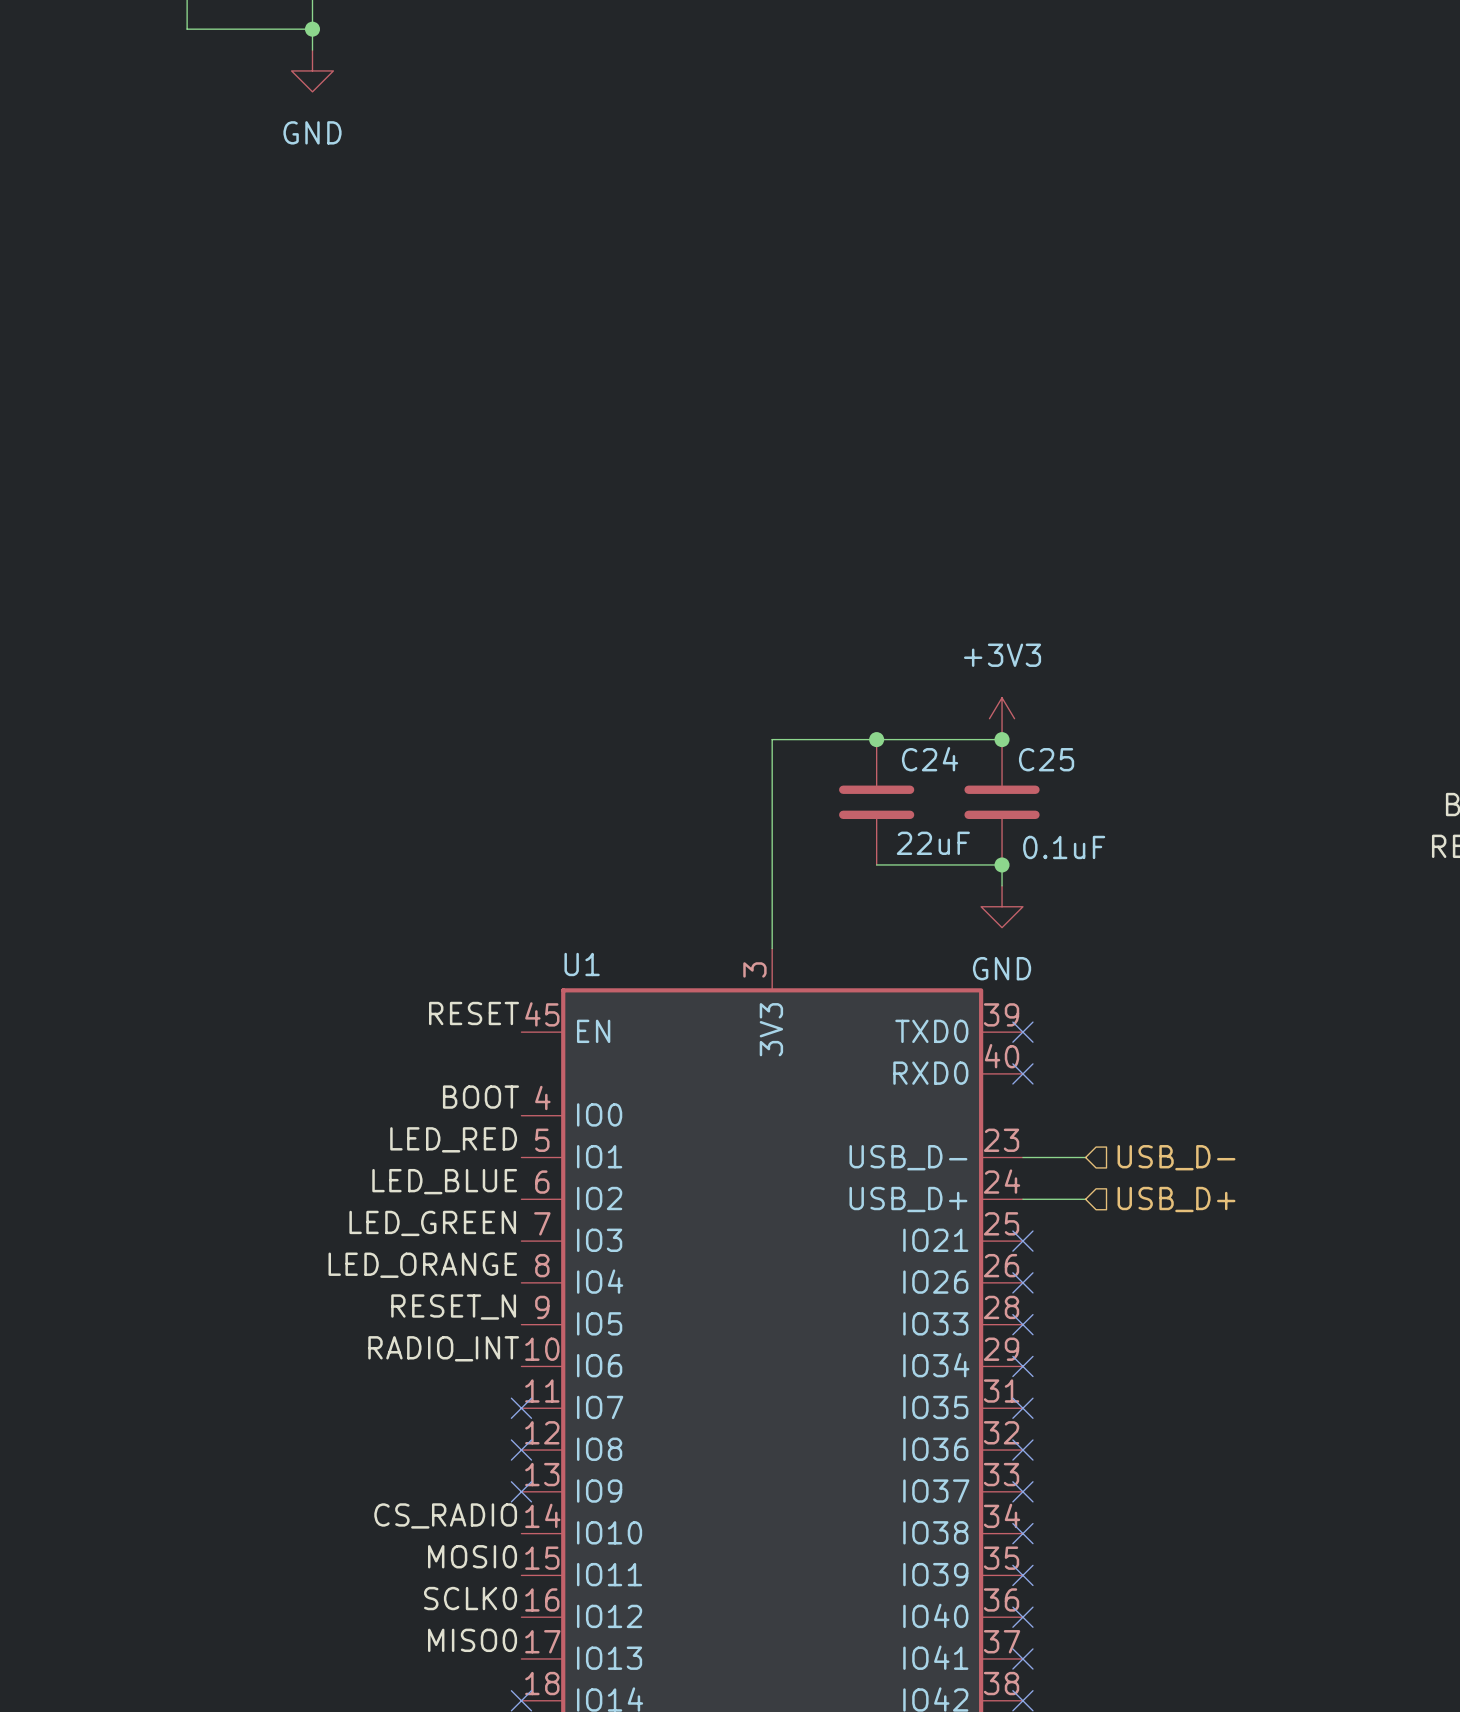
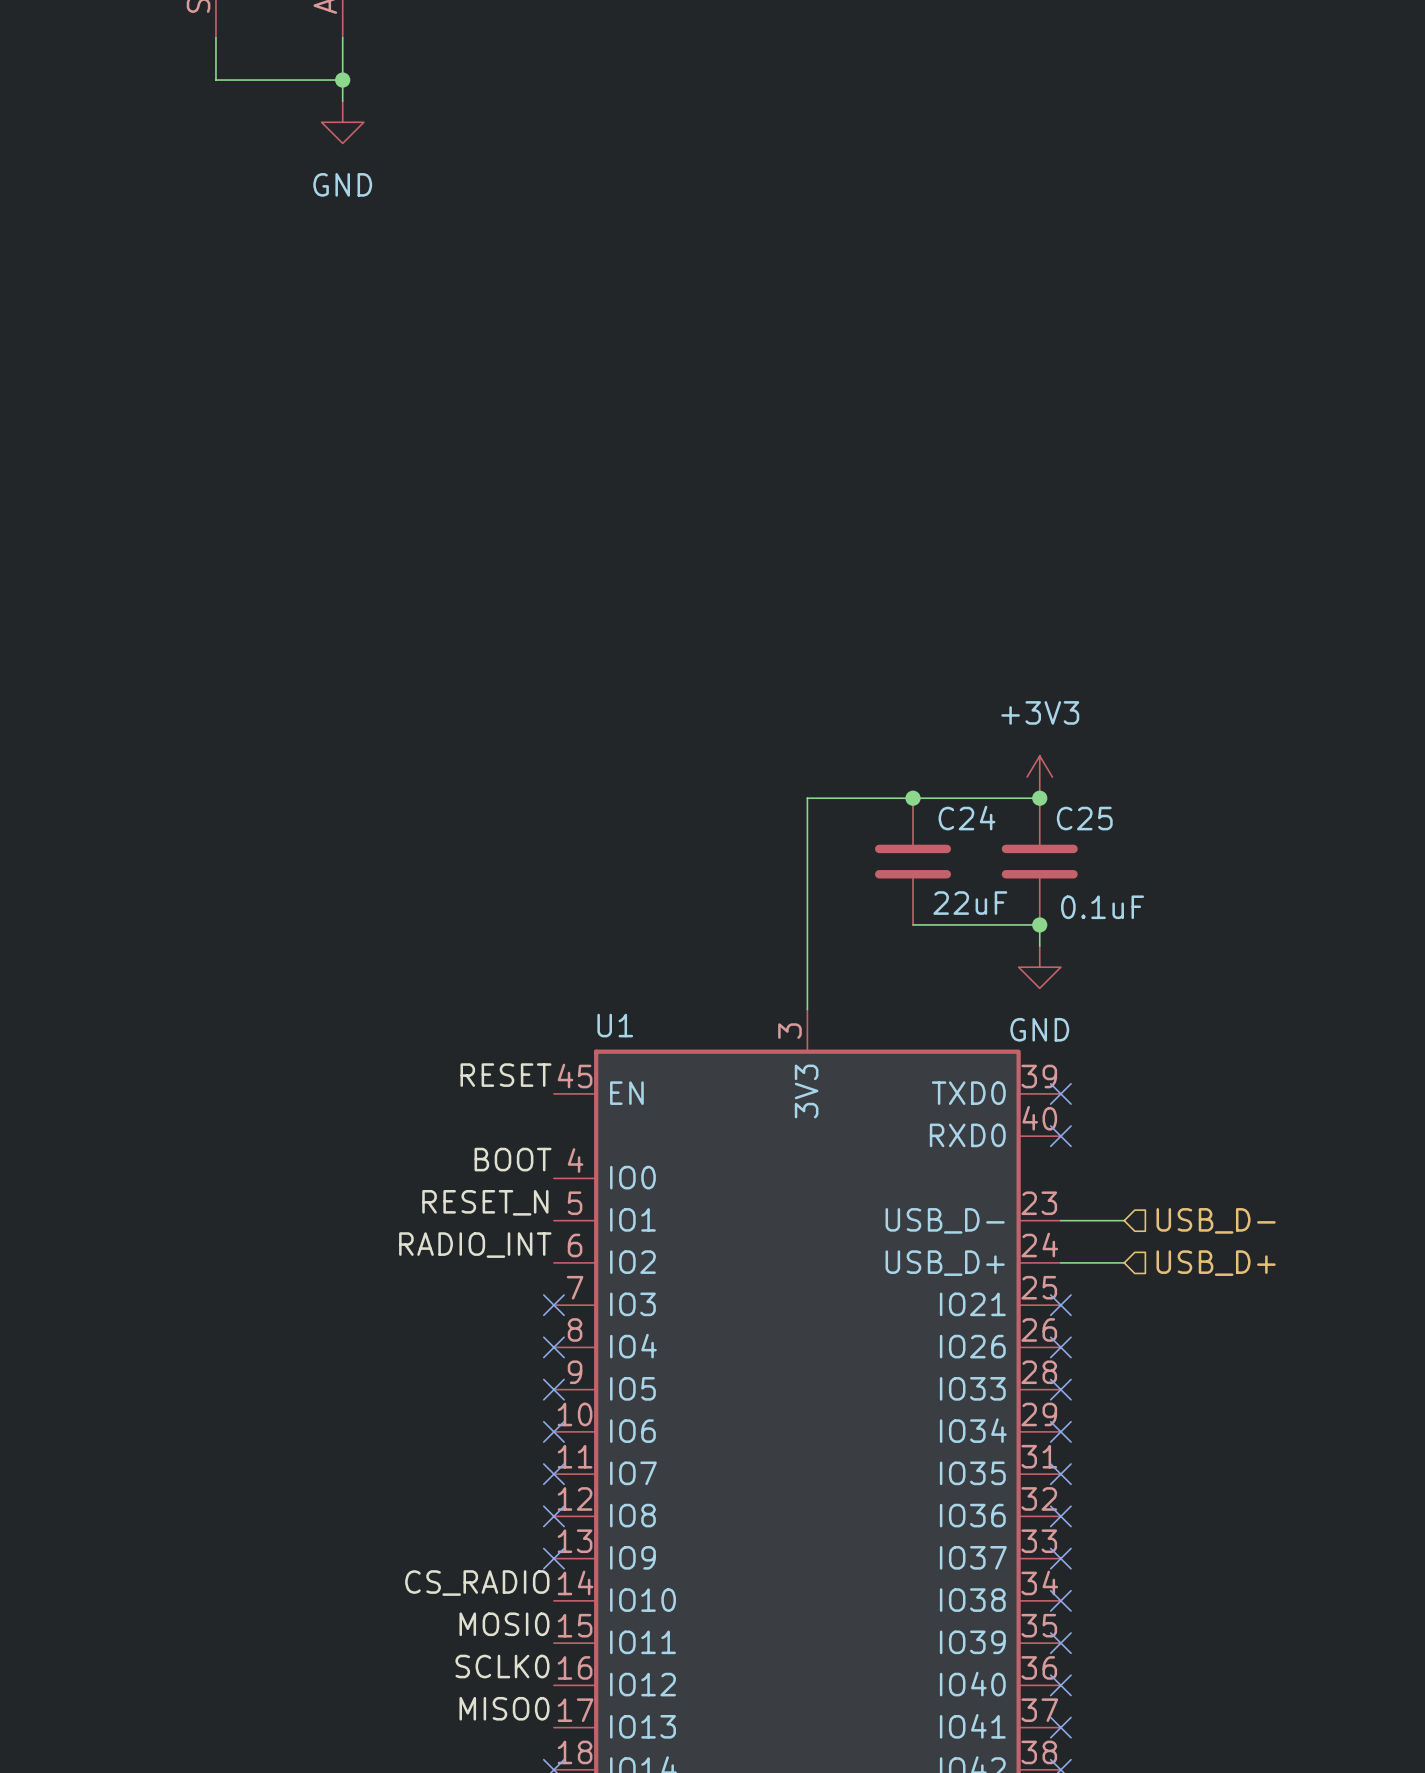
label: LED_RED (453, 1139) -> RESET_N (485, 1202)
label: LED_BLUE (444, 1181) -> RADIO_INT (475, 1245)
label: LED_GREEN (432, 1223) -> none
no-connect mark: none -> (553, 1305)
label: LED_ORANGE (422, 1265) -> none
no-connect mark: none -> (553, 1347)
label: RESET_N (453, 1307) -> none
no-connect mark: none -> (553, 1389)
label: RADIO_INT (443, 1348) -> none
no-connect mark: none -> (553, 1431)

